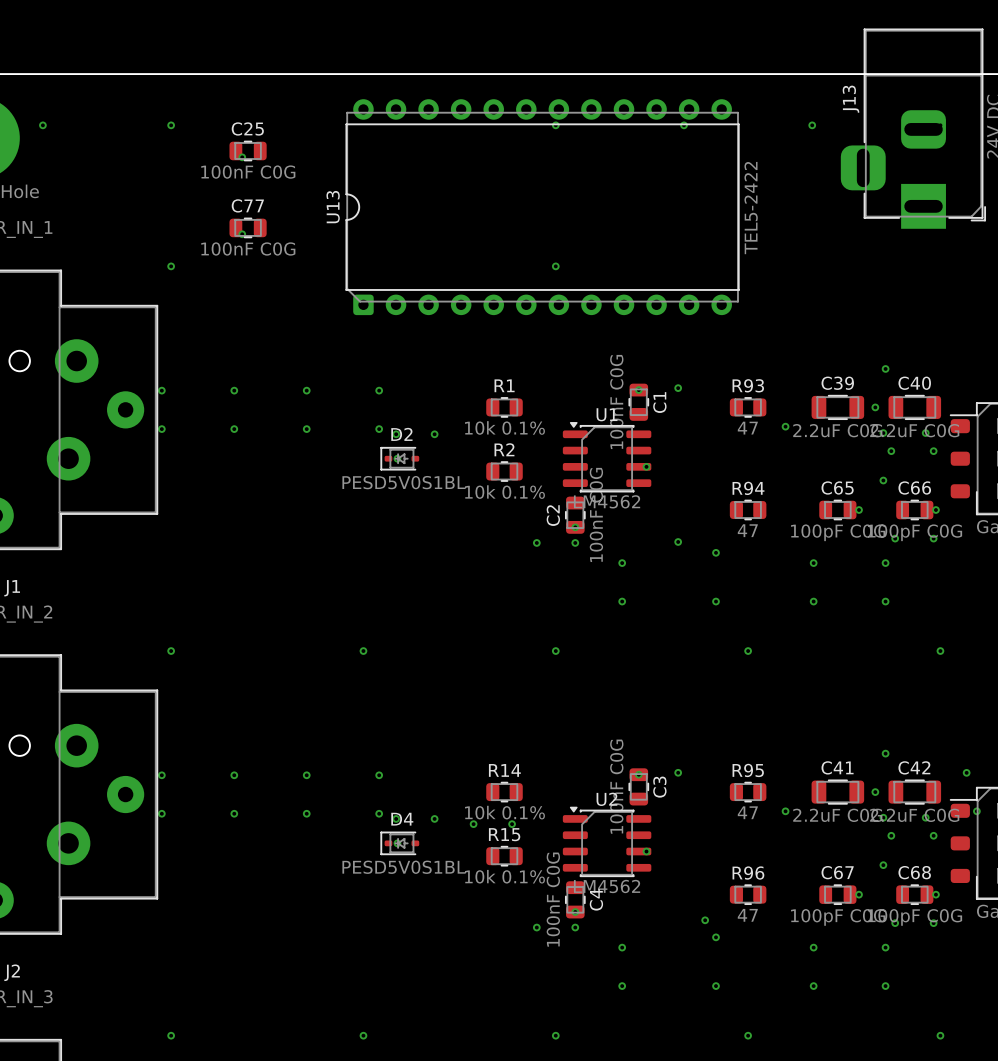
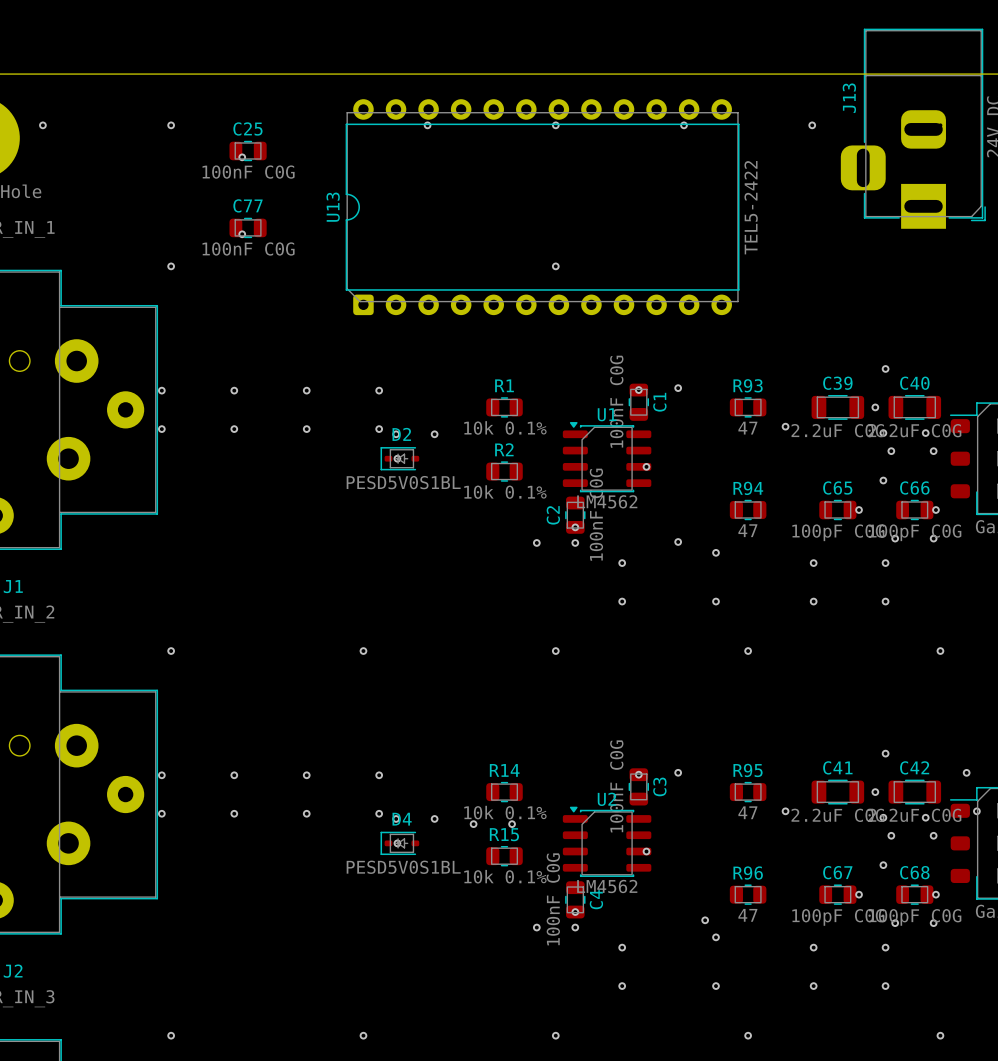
via: none -> (427, 125)

